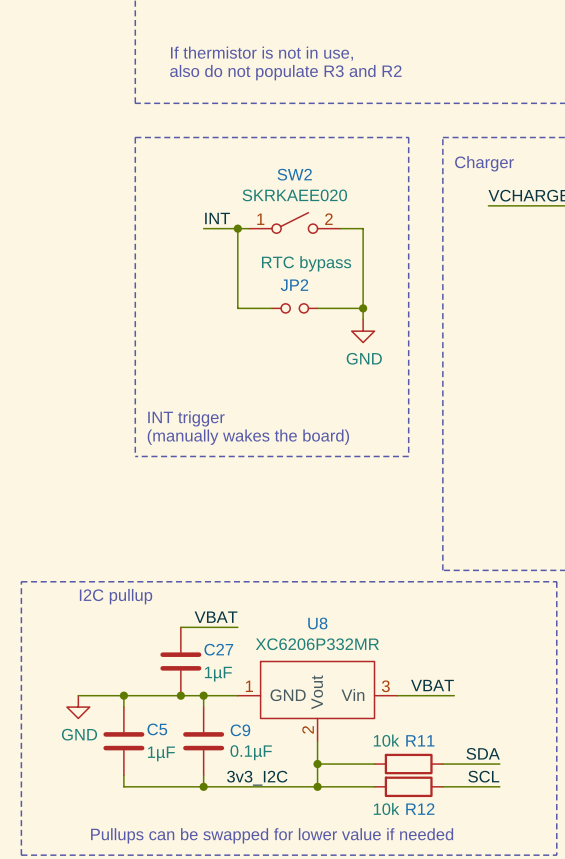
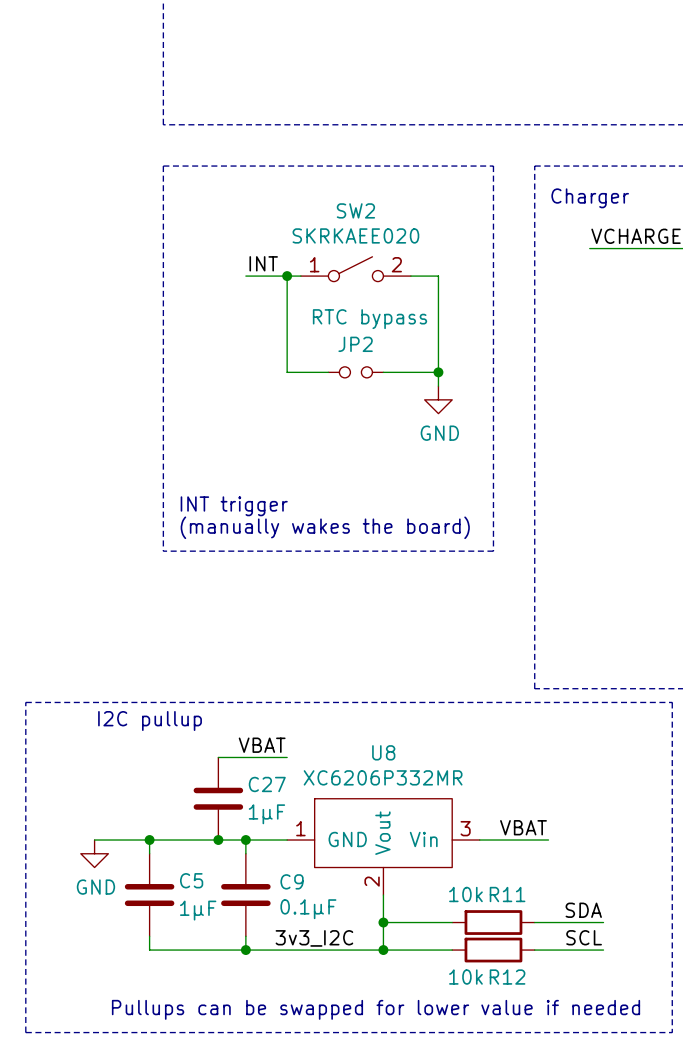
text: If thermistor is not in use, (261, 53) -> none
text: also do not populate R3 and R2 (285, 72) -> none

